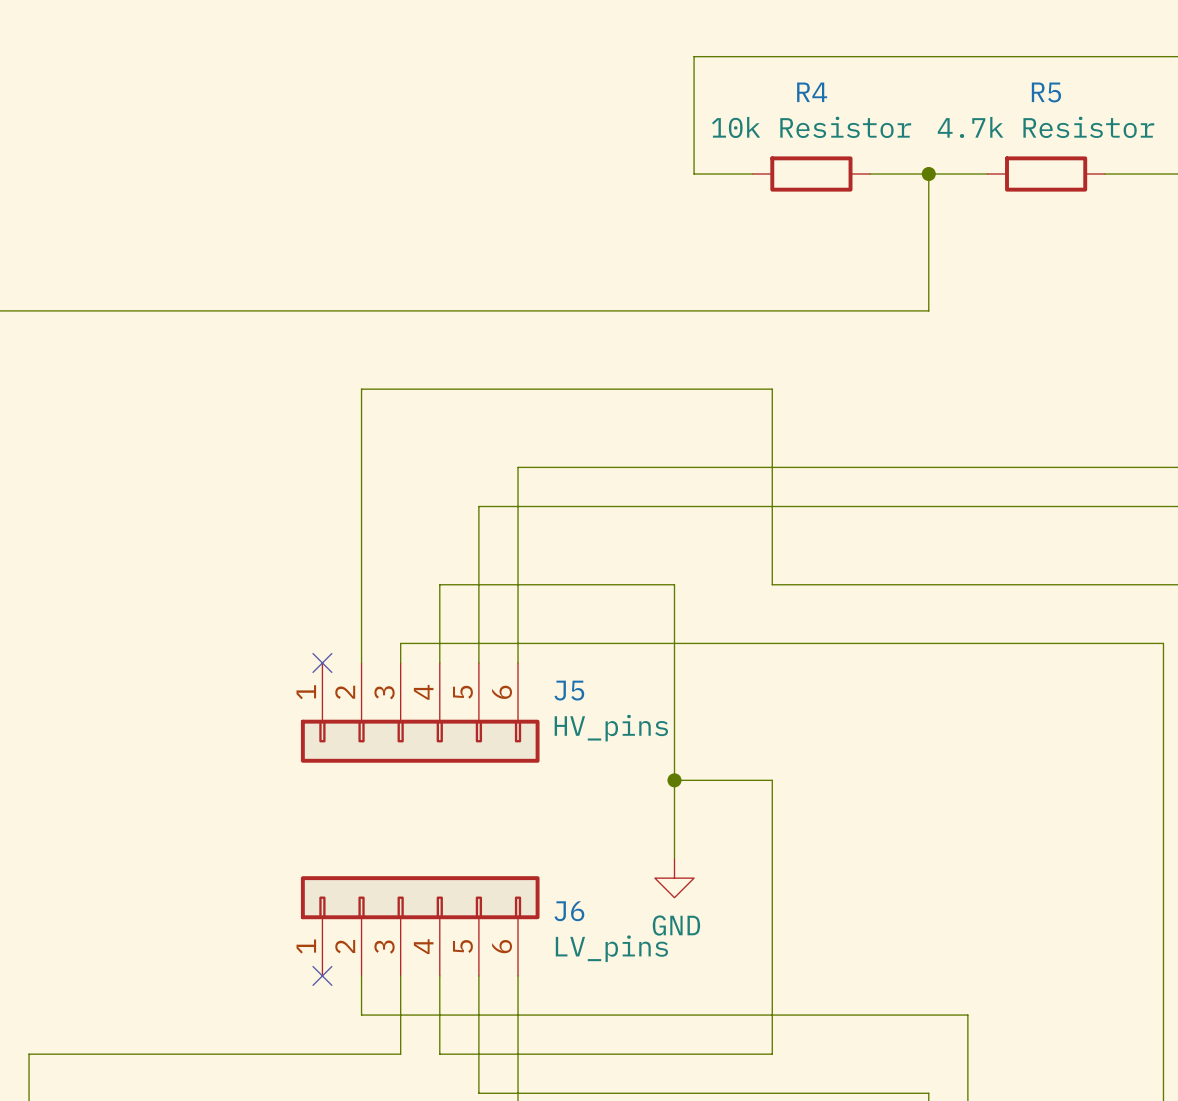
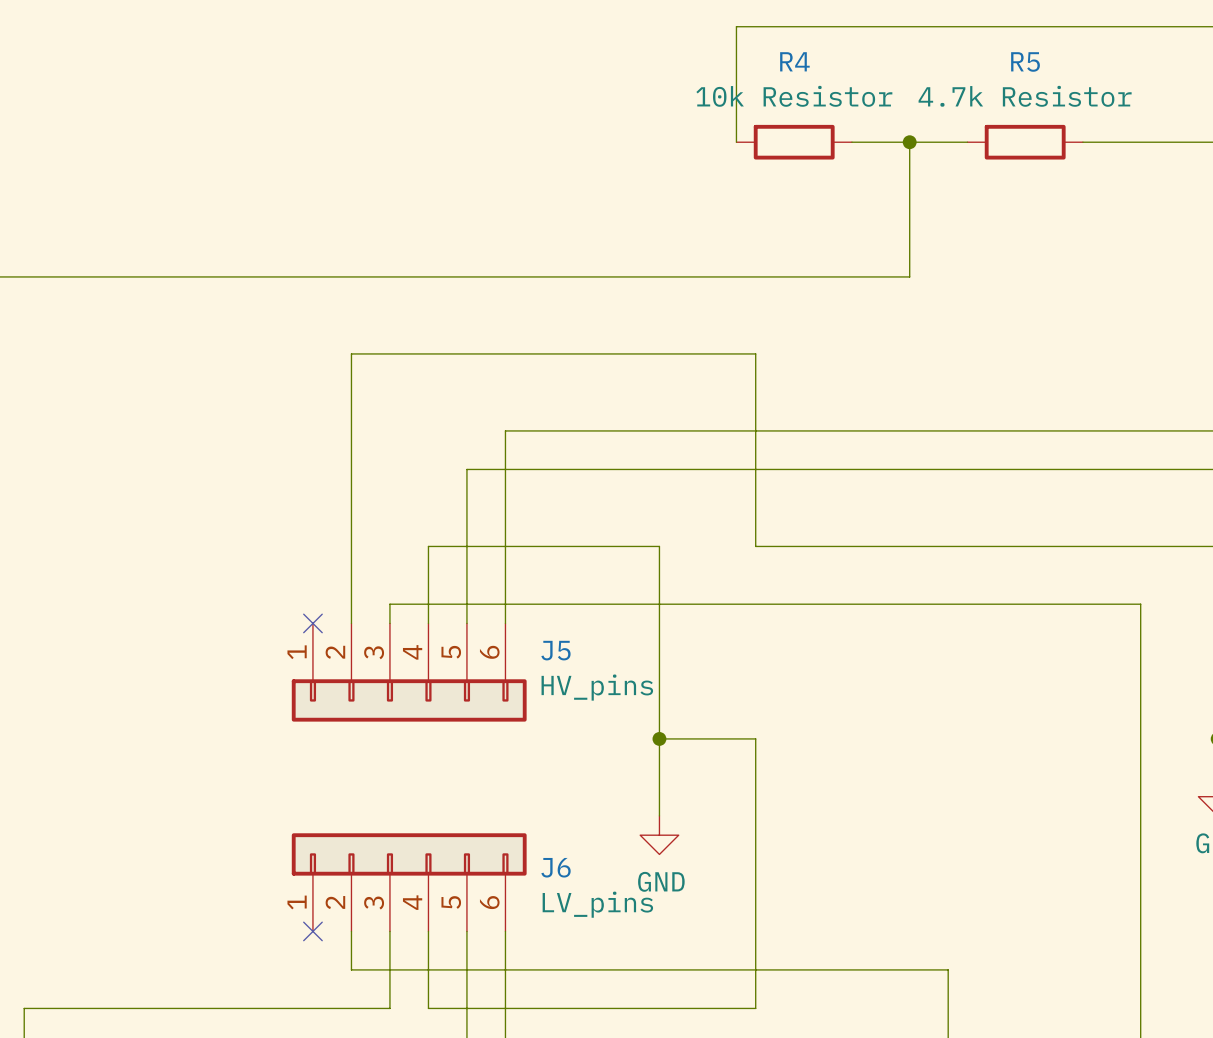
wire: (752, 56) (694, 56) (694, 174) (752, 174) -> (736, 26) (736, 142)

